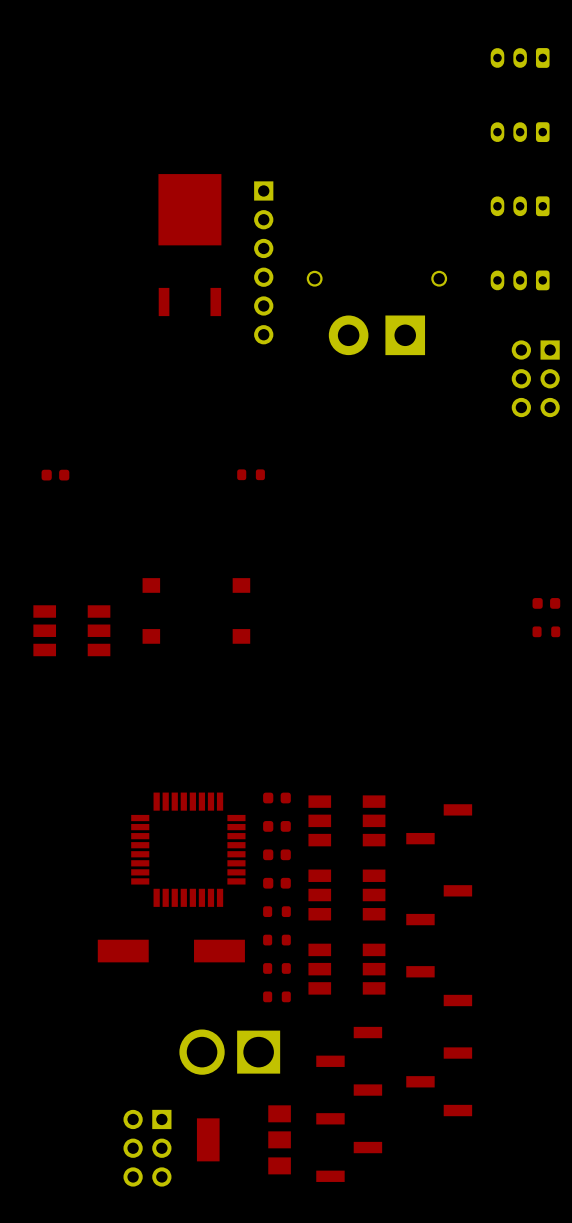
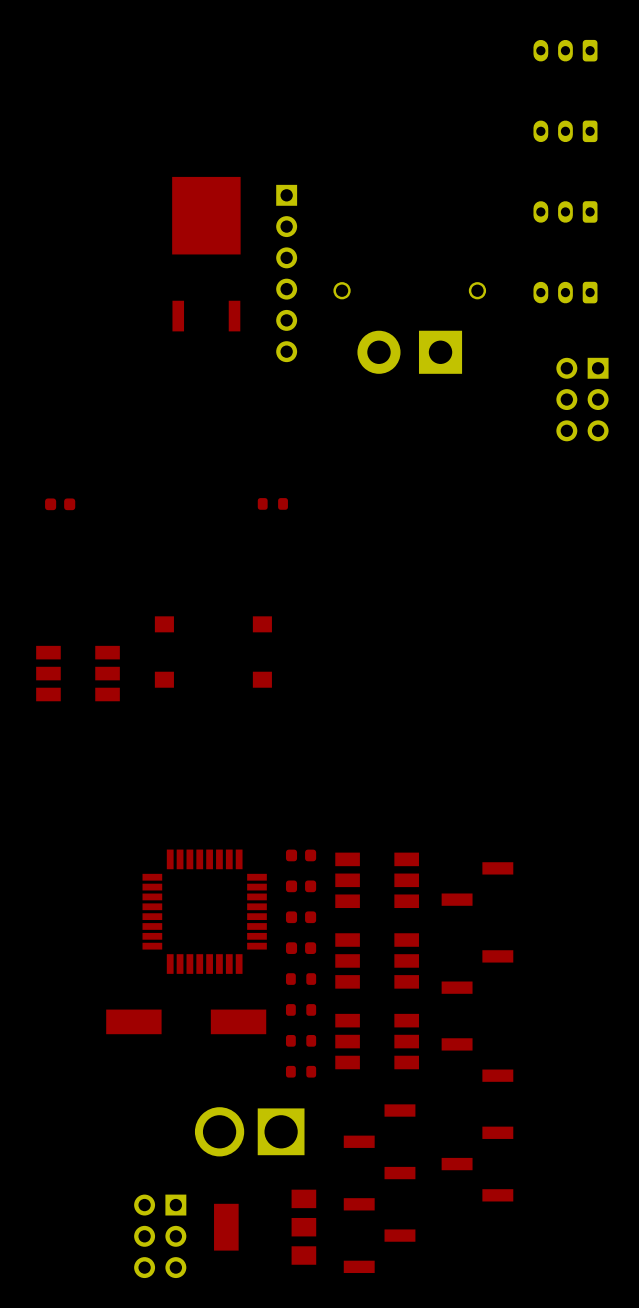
part: (546, 603) -> none
part: (546, 631) -> none

